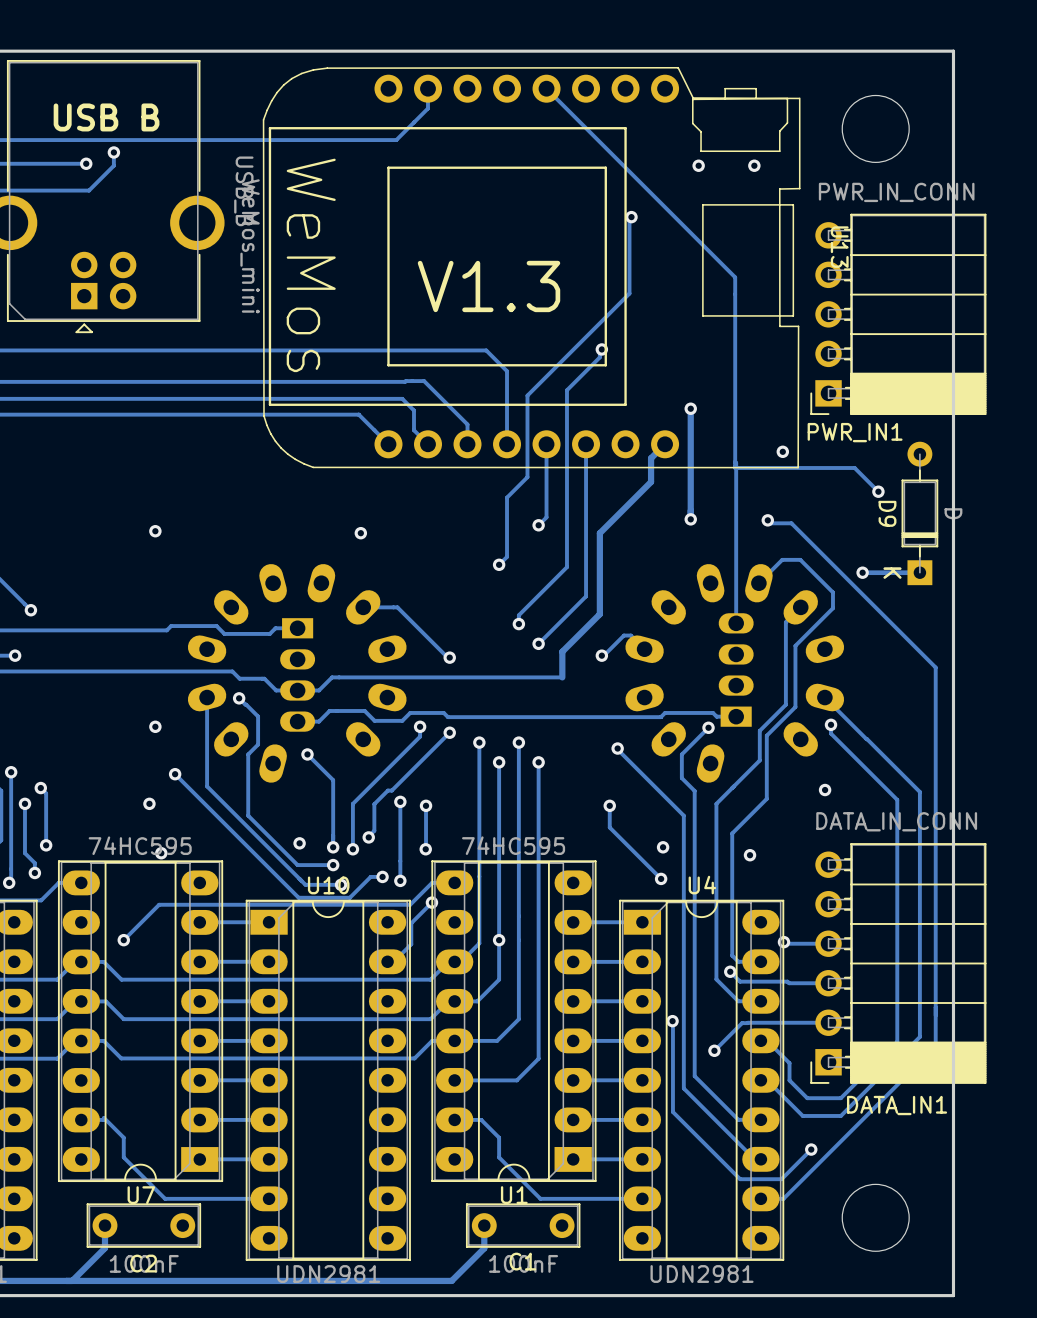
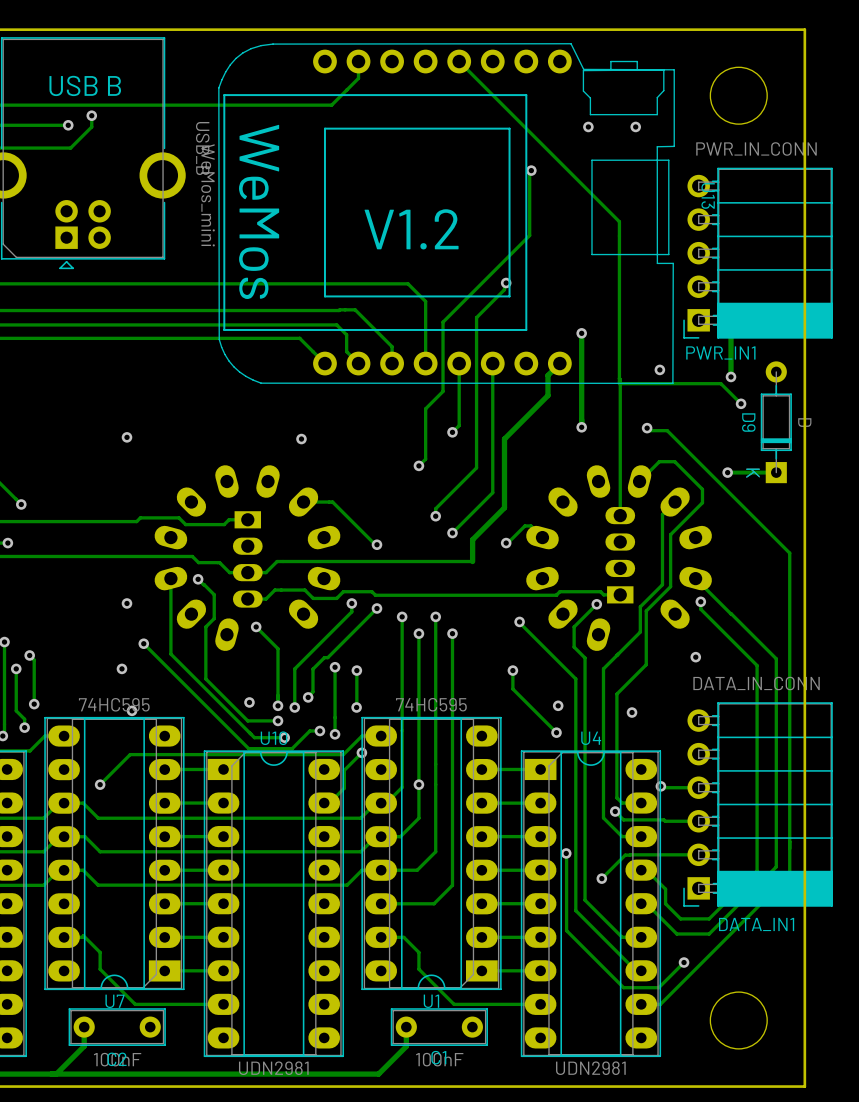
text: V1.3 (488, 286) -> V1.2 (411, 229)
track: none -> (731, 319) (731, 376)
via: none -> (731, 376)

